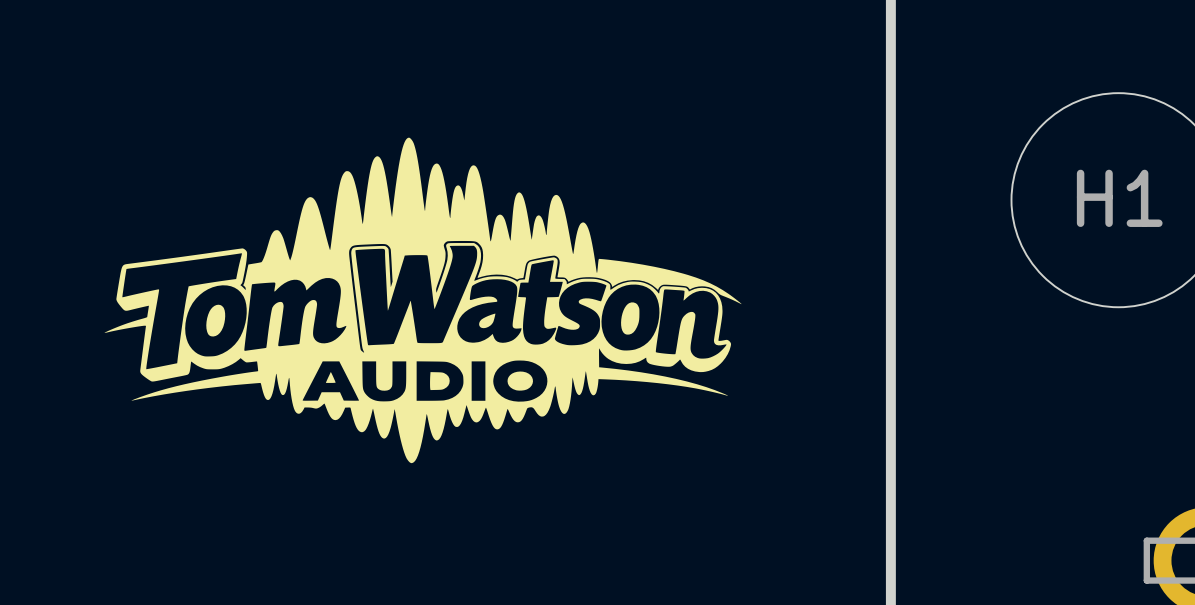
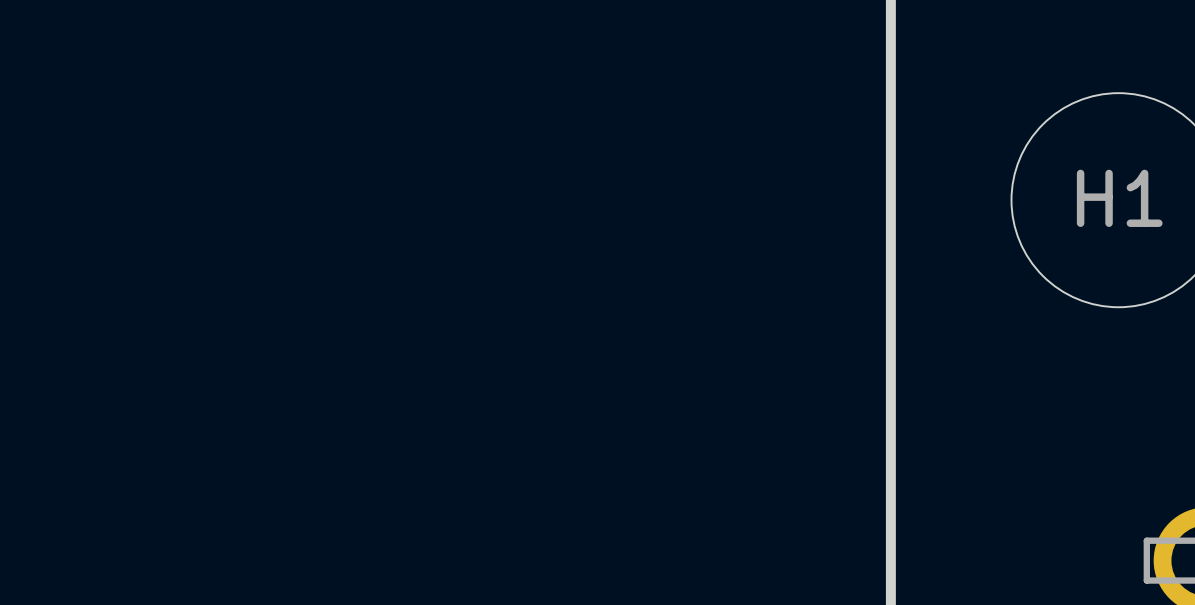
drawing: [104, 137, 742, 464] -> none

